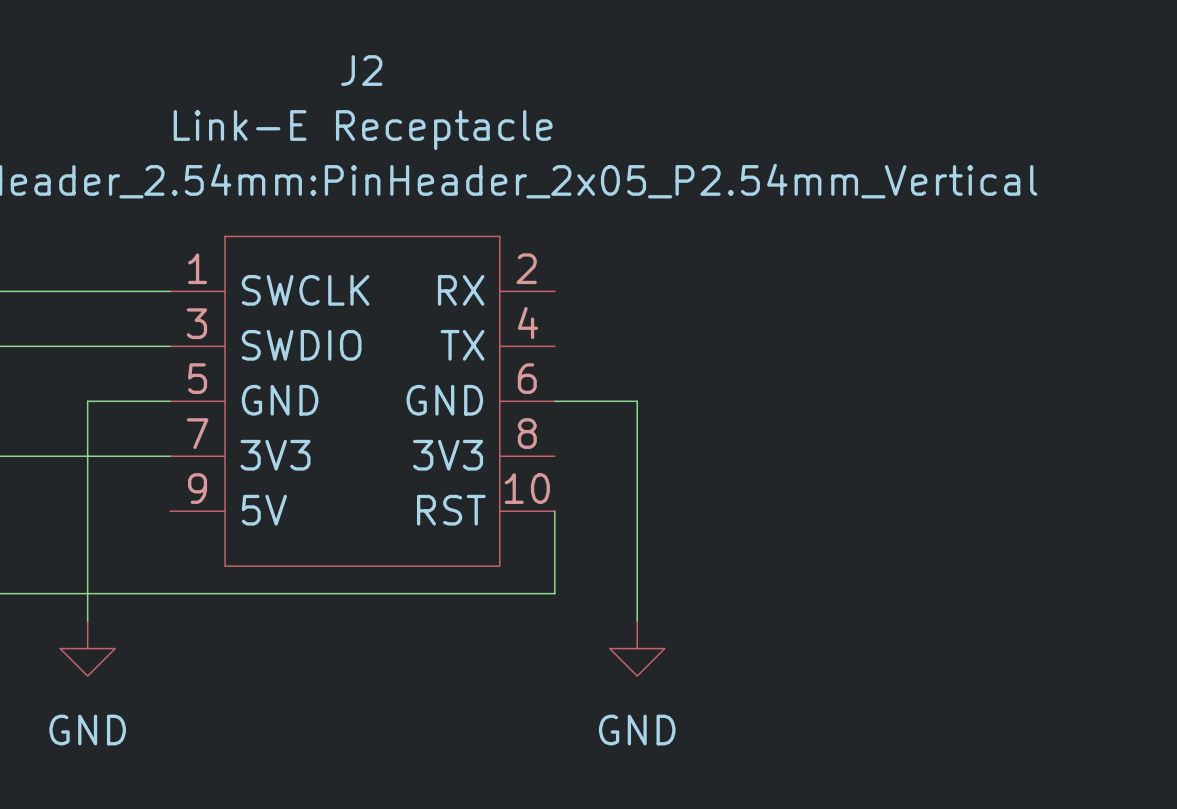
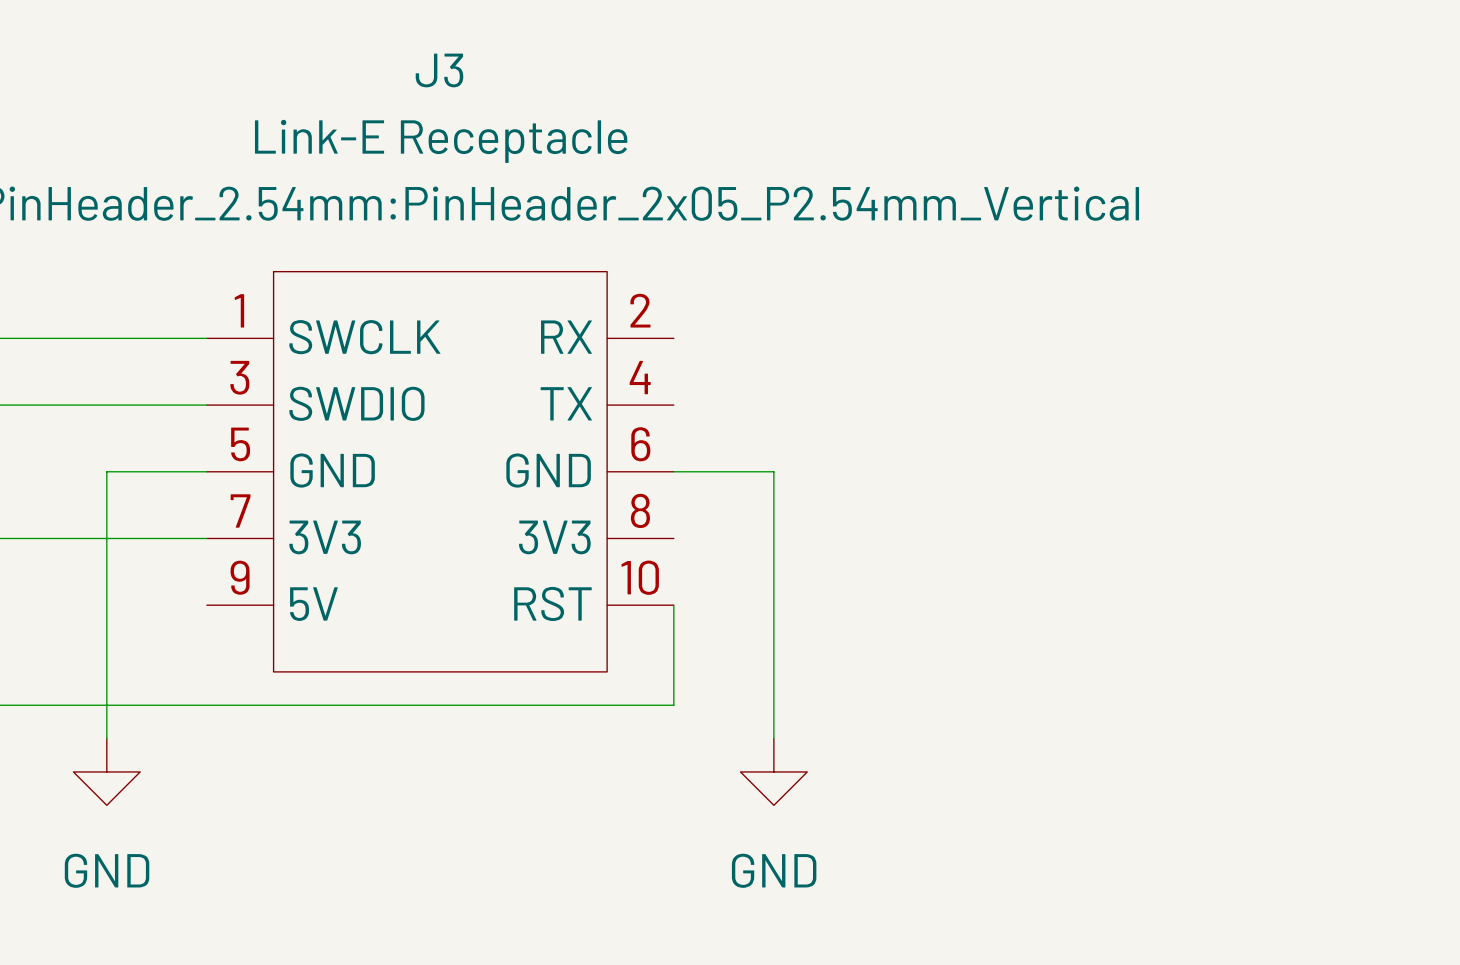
J2 name: J2 (361, 70) -> J3 (439, 70)

